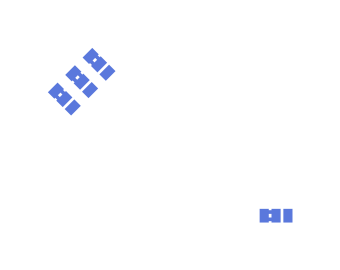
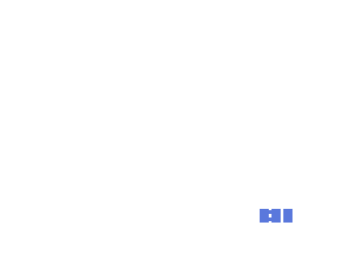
part: (99, 64) -> none
part: (81, 81) -> none
part: (64, 99) -> none

